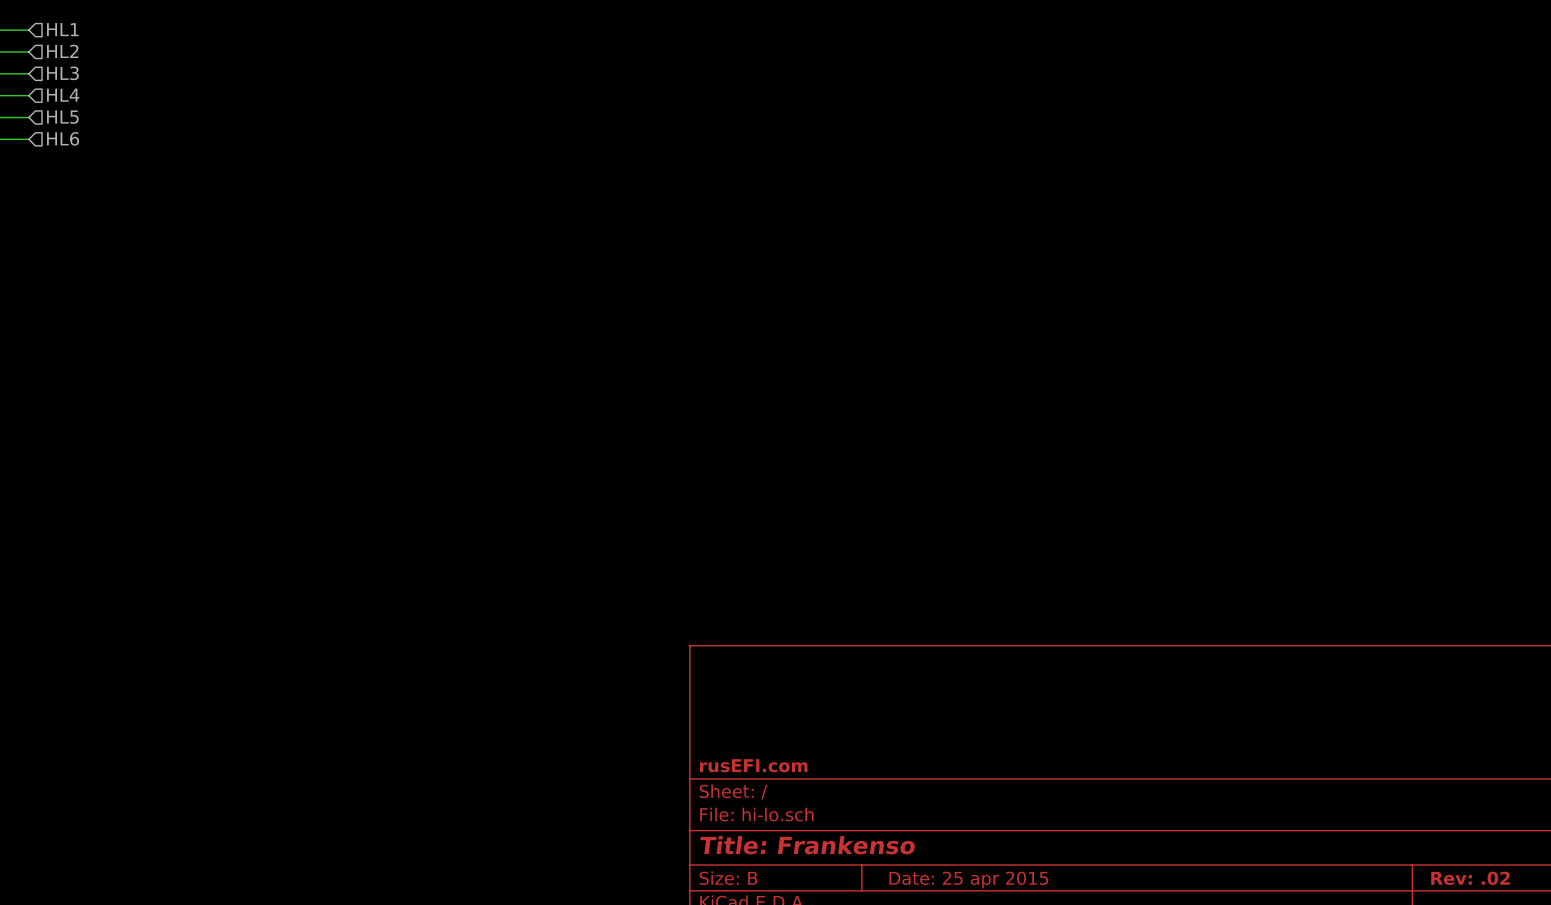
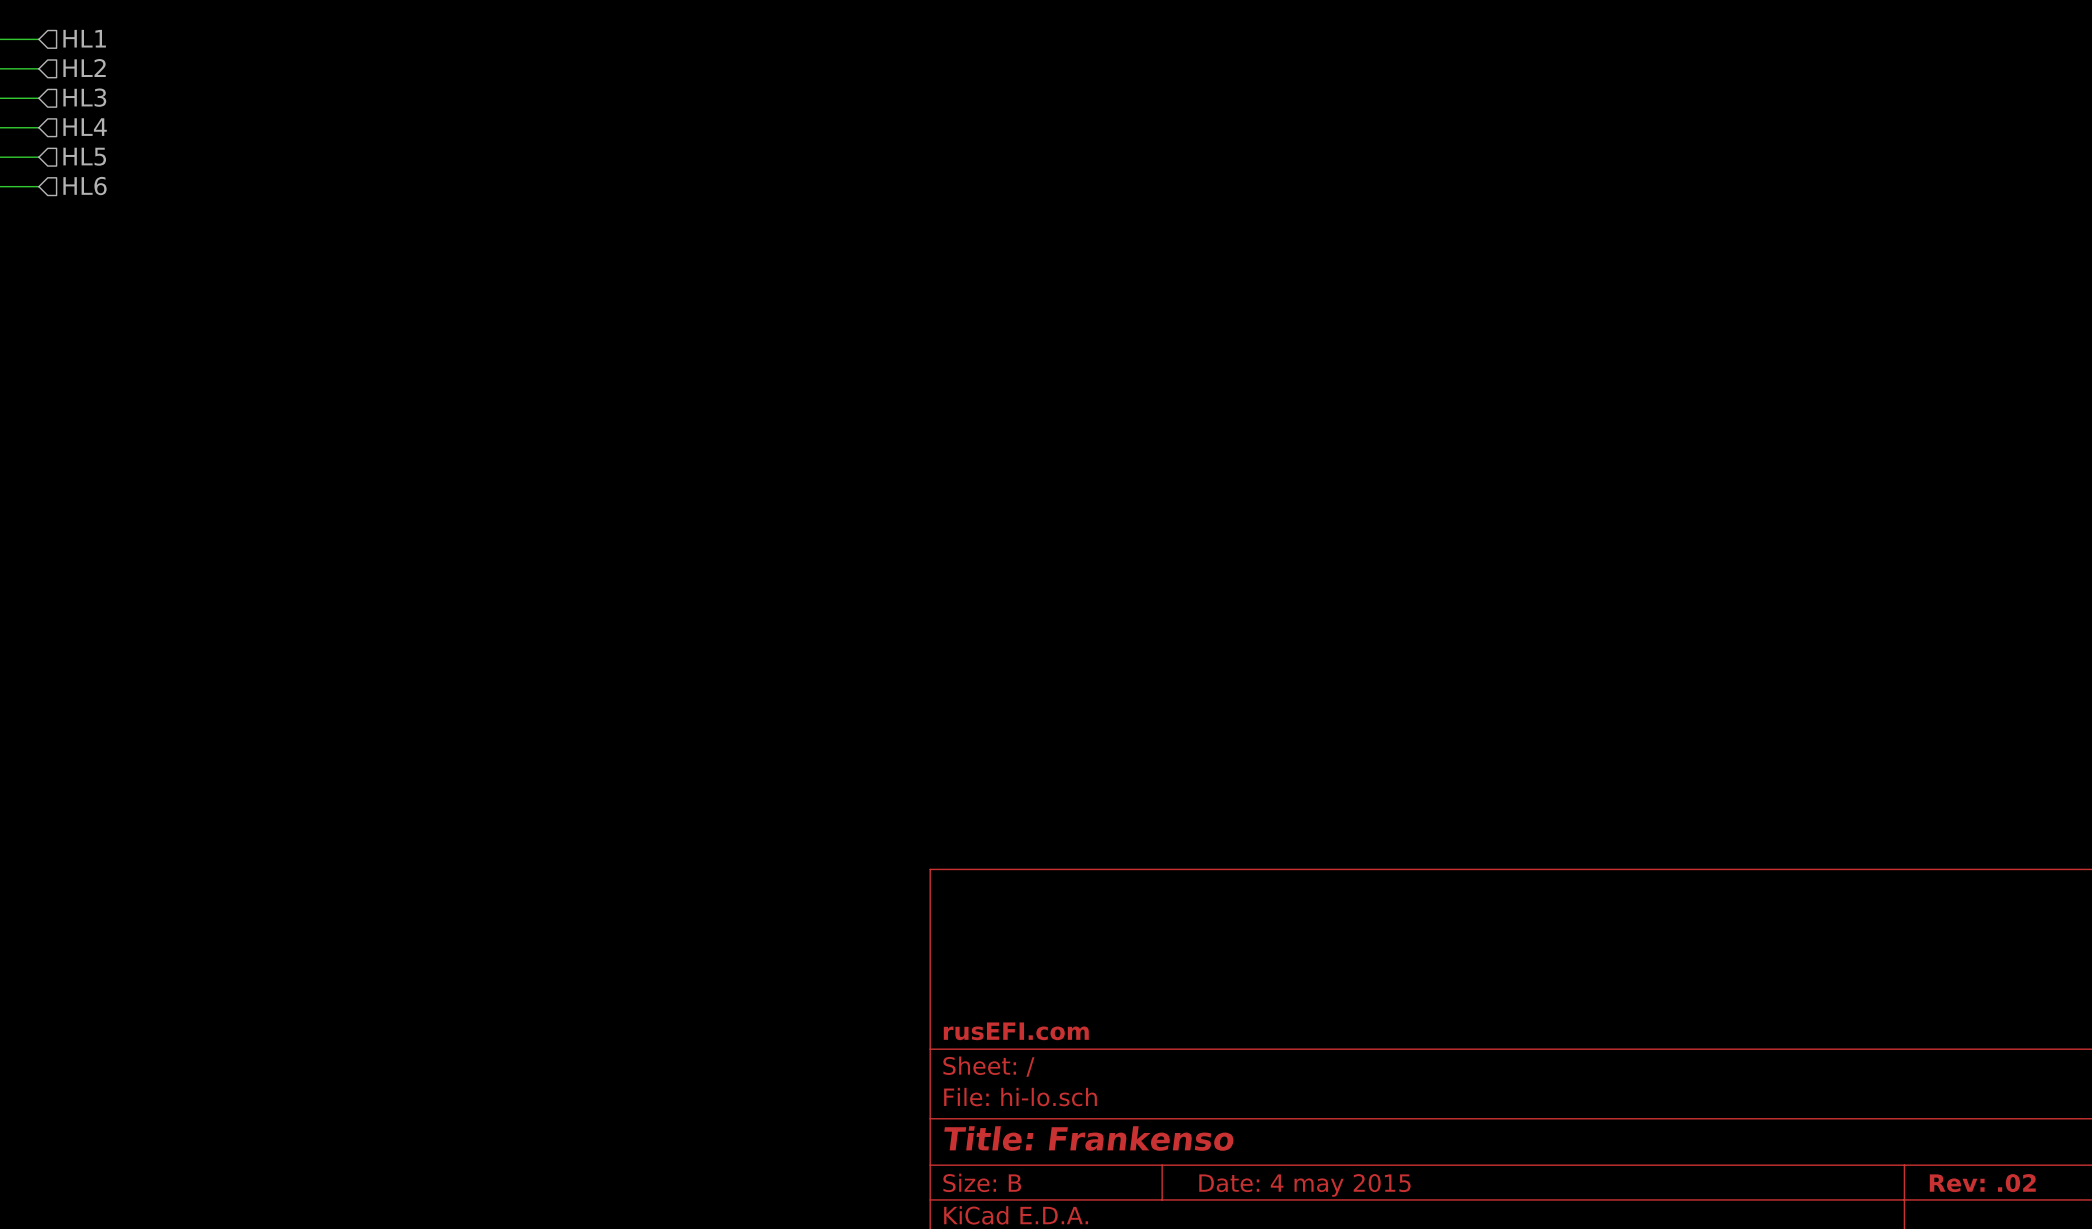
title block: Date: 25 apr 2015 (968, 880) -> Date: 4 may 2015 (1304, 1185)

